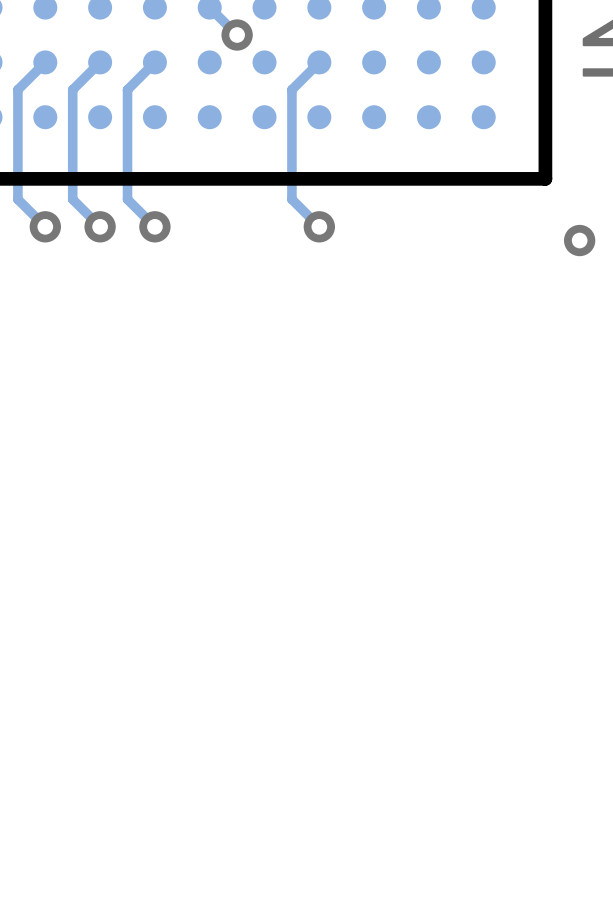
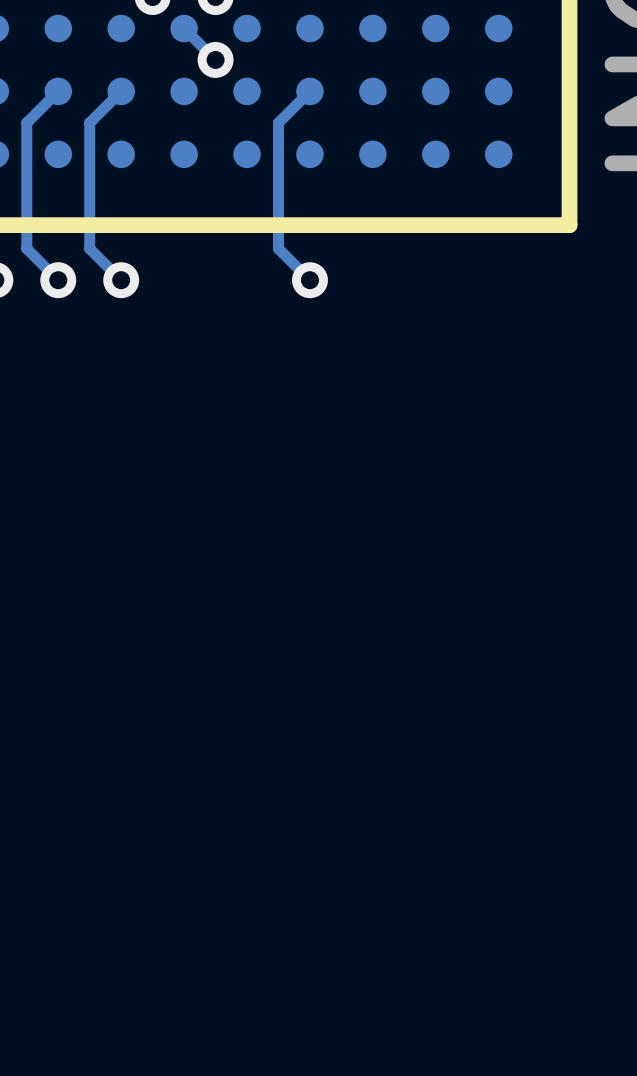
via: (579, 240) -> none

